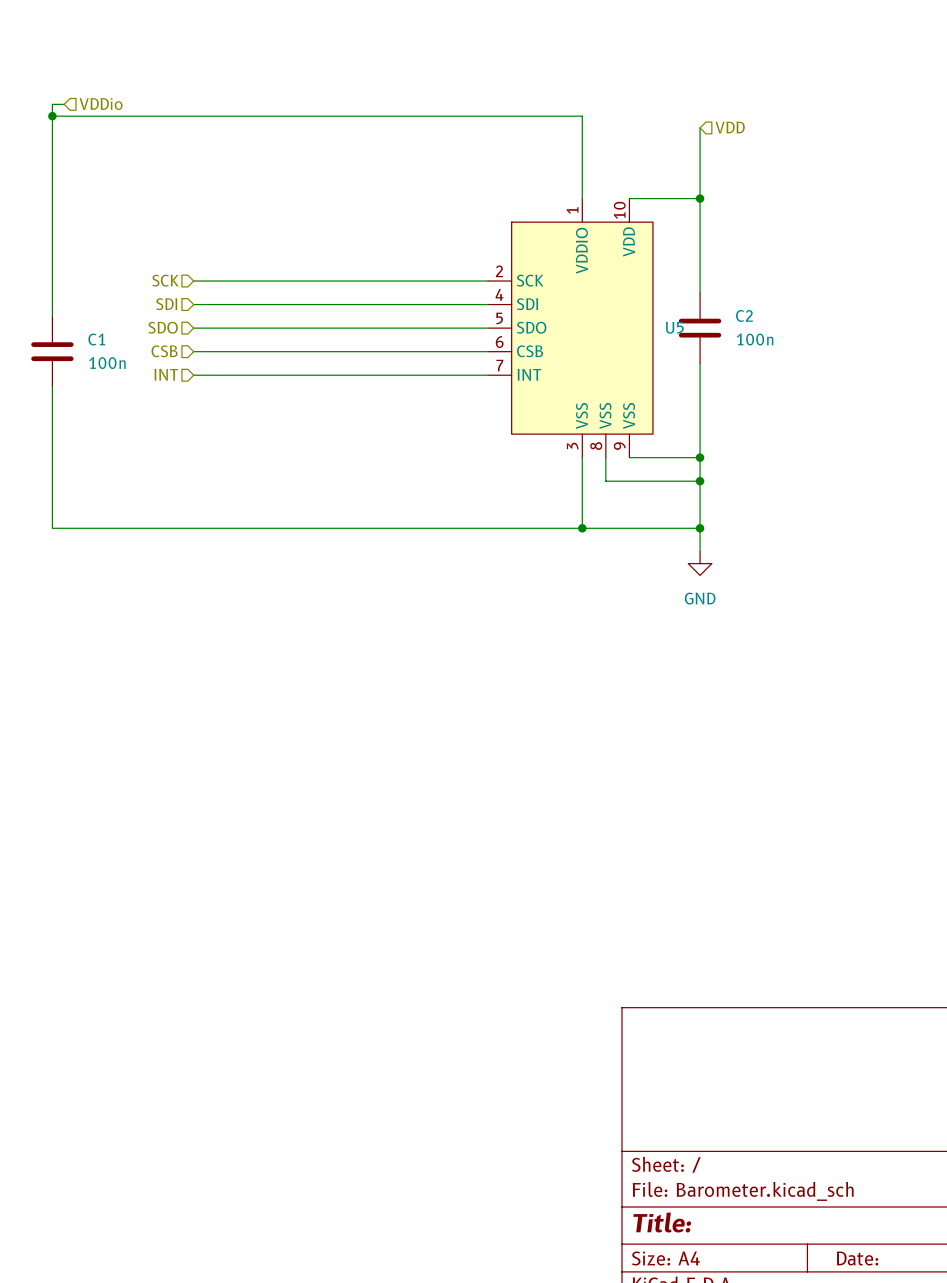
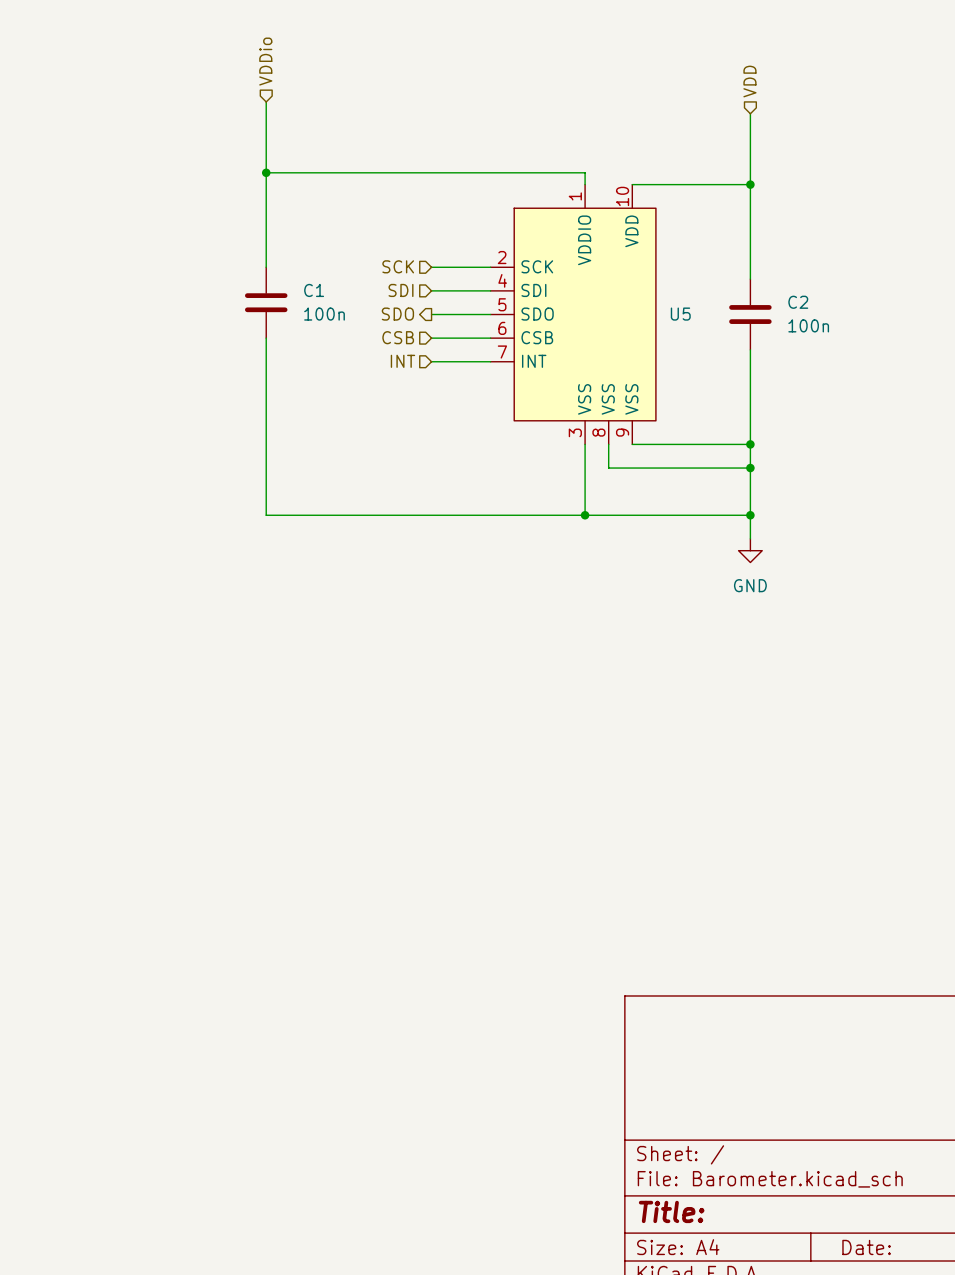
wire: (64, 104) (52, 104) (52, 316) -> none
hierarchical label rotation: 0° (101, 104) -> 90° counterclockwise (265, 61)
hierarchical label position: VDDio (101, 104) -> VDDio (265, 61)
wire: (52, 116) (582, 116) (582, 186) -> (266, 172) (585, 172)
junction: (52, 116) -> none
wire: none -> (266, 101) (266, 267)
wire: (700, 127) (700, 292) -> (750, 113) (750, 279)
hierarchical label rotation: 0° (730, 127) -> 90° counterclockwise (749, 81)
junction: none -> (266, 172)
wire: none -> (703, 184) (750, 184)
junction position: (700, 198) -> (750, 184)
hierarchical label: SCK (165, 280) -> none
hierarchical label: none -> SCK (398, 266)
wire: (193, 281) (429, 281) -> none
hierarchical label: SDI (166, 304) -> none
wire: (193, 304) (429, 304) -> none
hierarchical label: none -> SDI (401, 290)
hierarchical label: SDO (163, 327) -> none
hierarchical label: none -> SDO (397, 314)
wire: (193, 328) (429, 328) -> none
C2 position: (700, 328) -> (750, 314)
C1 position: (52, 351) -> (266, 302)
hierarchical label: CSB (164, 351) -> none
wire: (193, 351) (429, 351) -> none
hierarchical label: none -> CSB (398, 337)
wire: (700, 363) (700, 551) -> (750, 349) (750, 538)
hierarchical label: INT (166, 374) -> none
hierarchical label: none -> INT (402, 361)
wire: (193, 375) (429, 375) -> none
wire: (52, 386) (52, 528) (264, 528) -> (266, 338) (266, 515)
wire: none -> (703, 444) (750, 444)
junction: (700, 457) -> none
junction: none -> (750, 444)
wire: none -> (703, 468) (750, 468)
junction: (700, 481) -> none
junction: none -> (750, 468)
wire: none -> (703, 515) (750, 515)
junction: (700, 528) -> none
junction: none -> (750, 515)
power symbol position: GND (700, 563) -> GND (750, 550)

